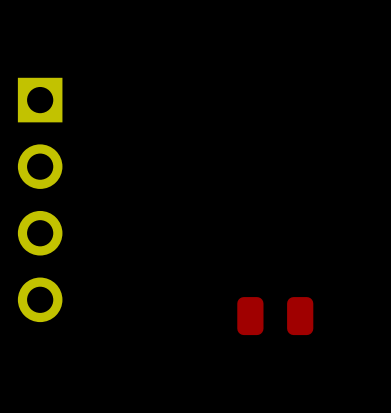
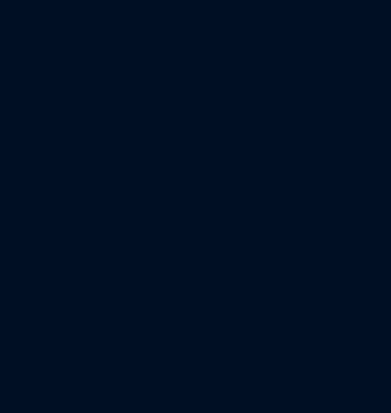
part: (40, 199) -> none
part: (275, 316) -> none

